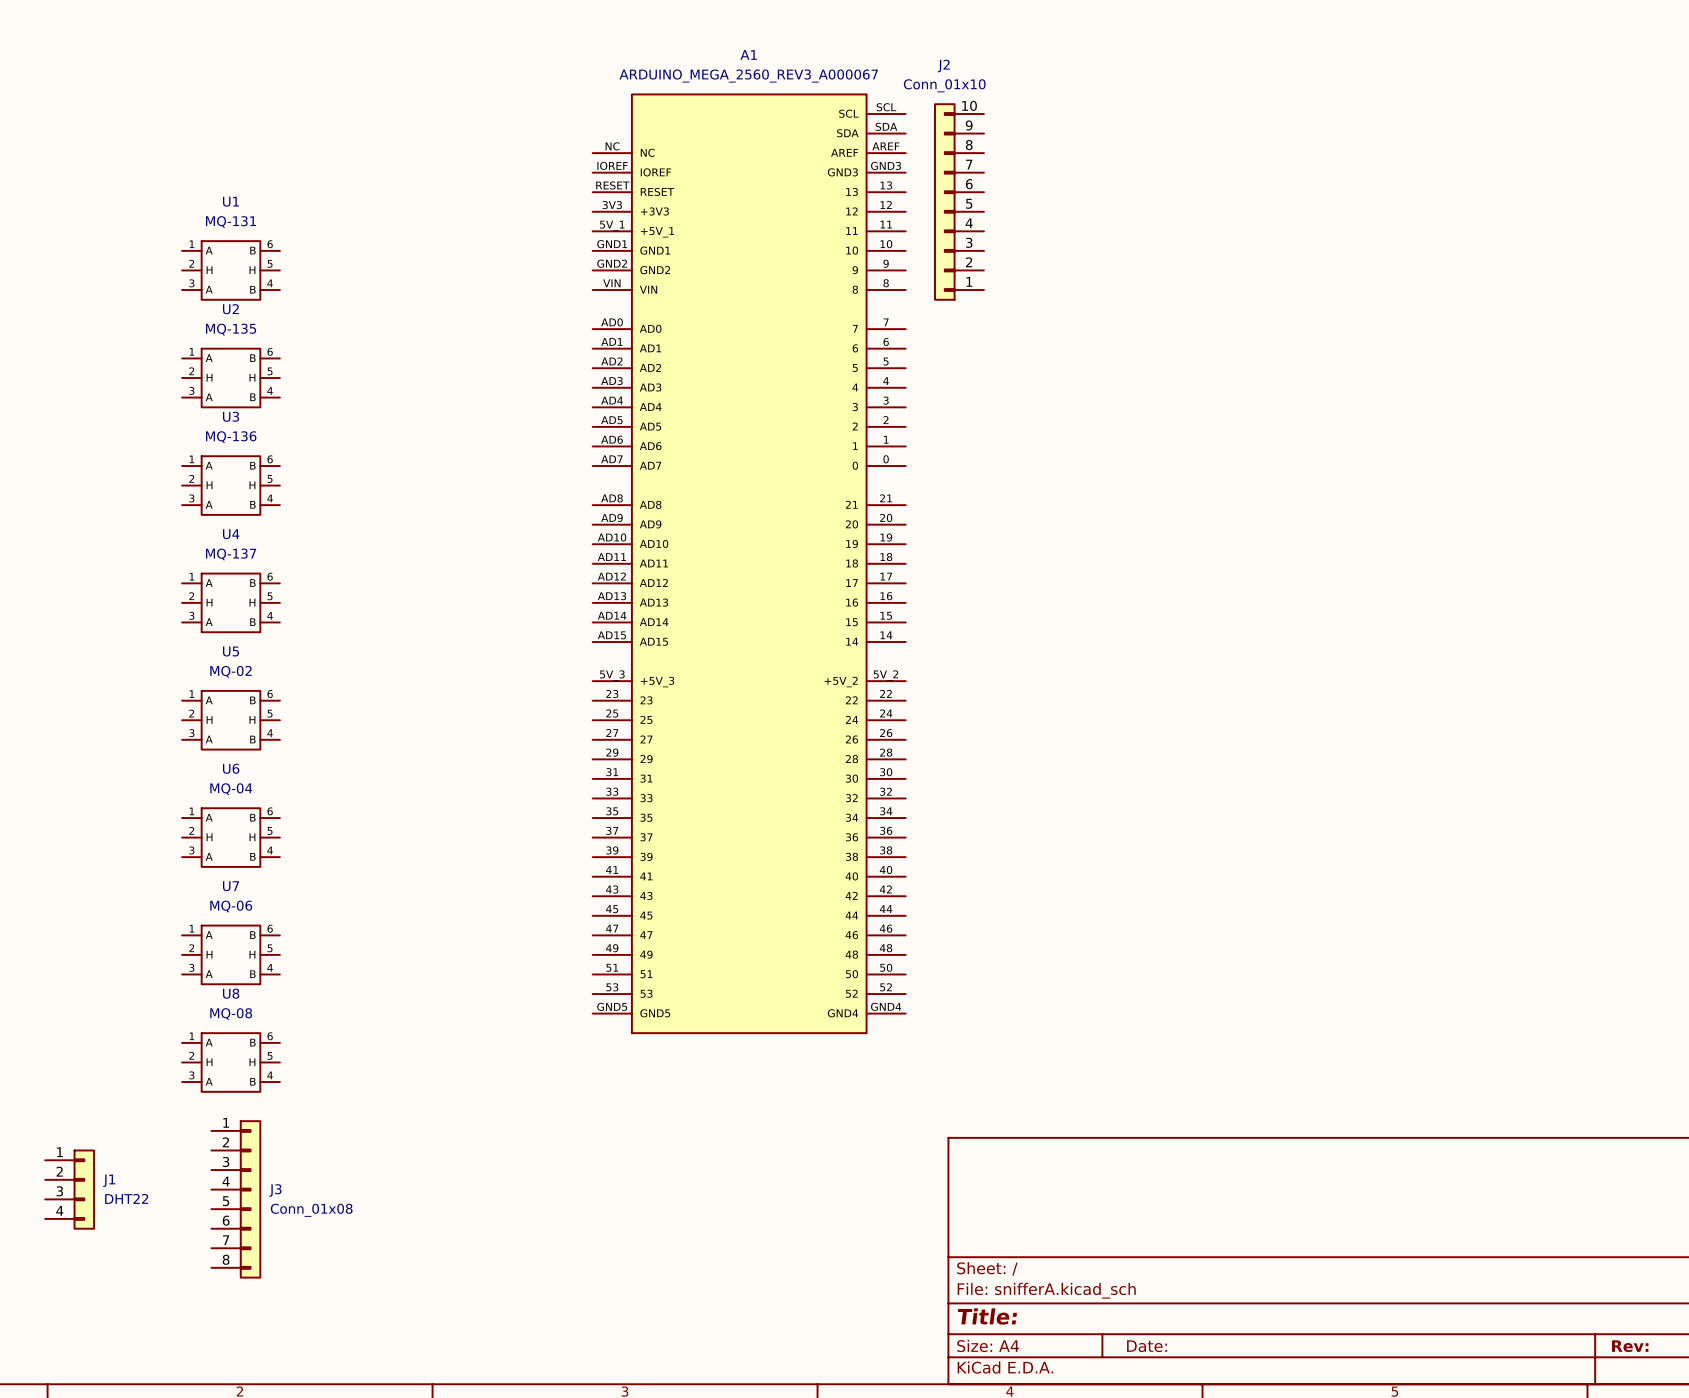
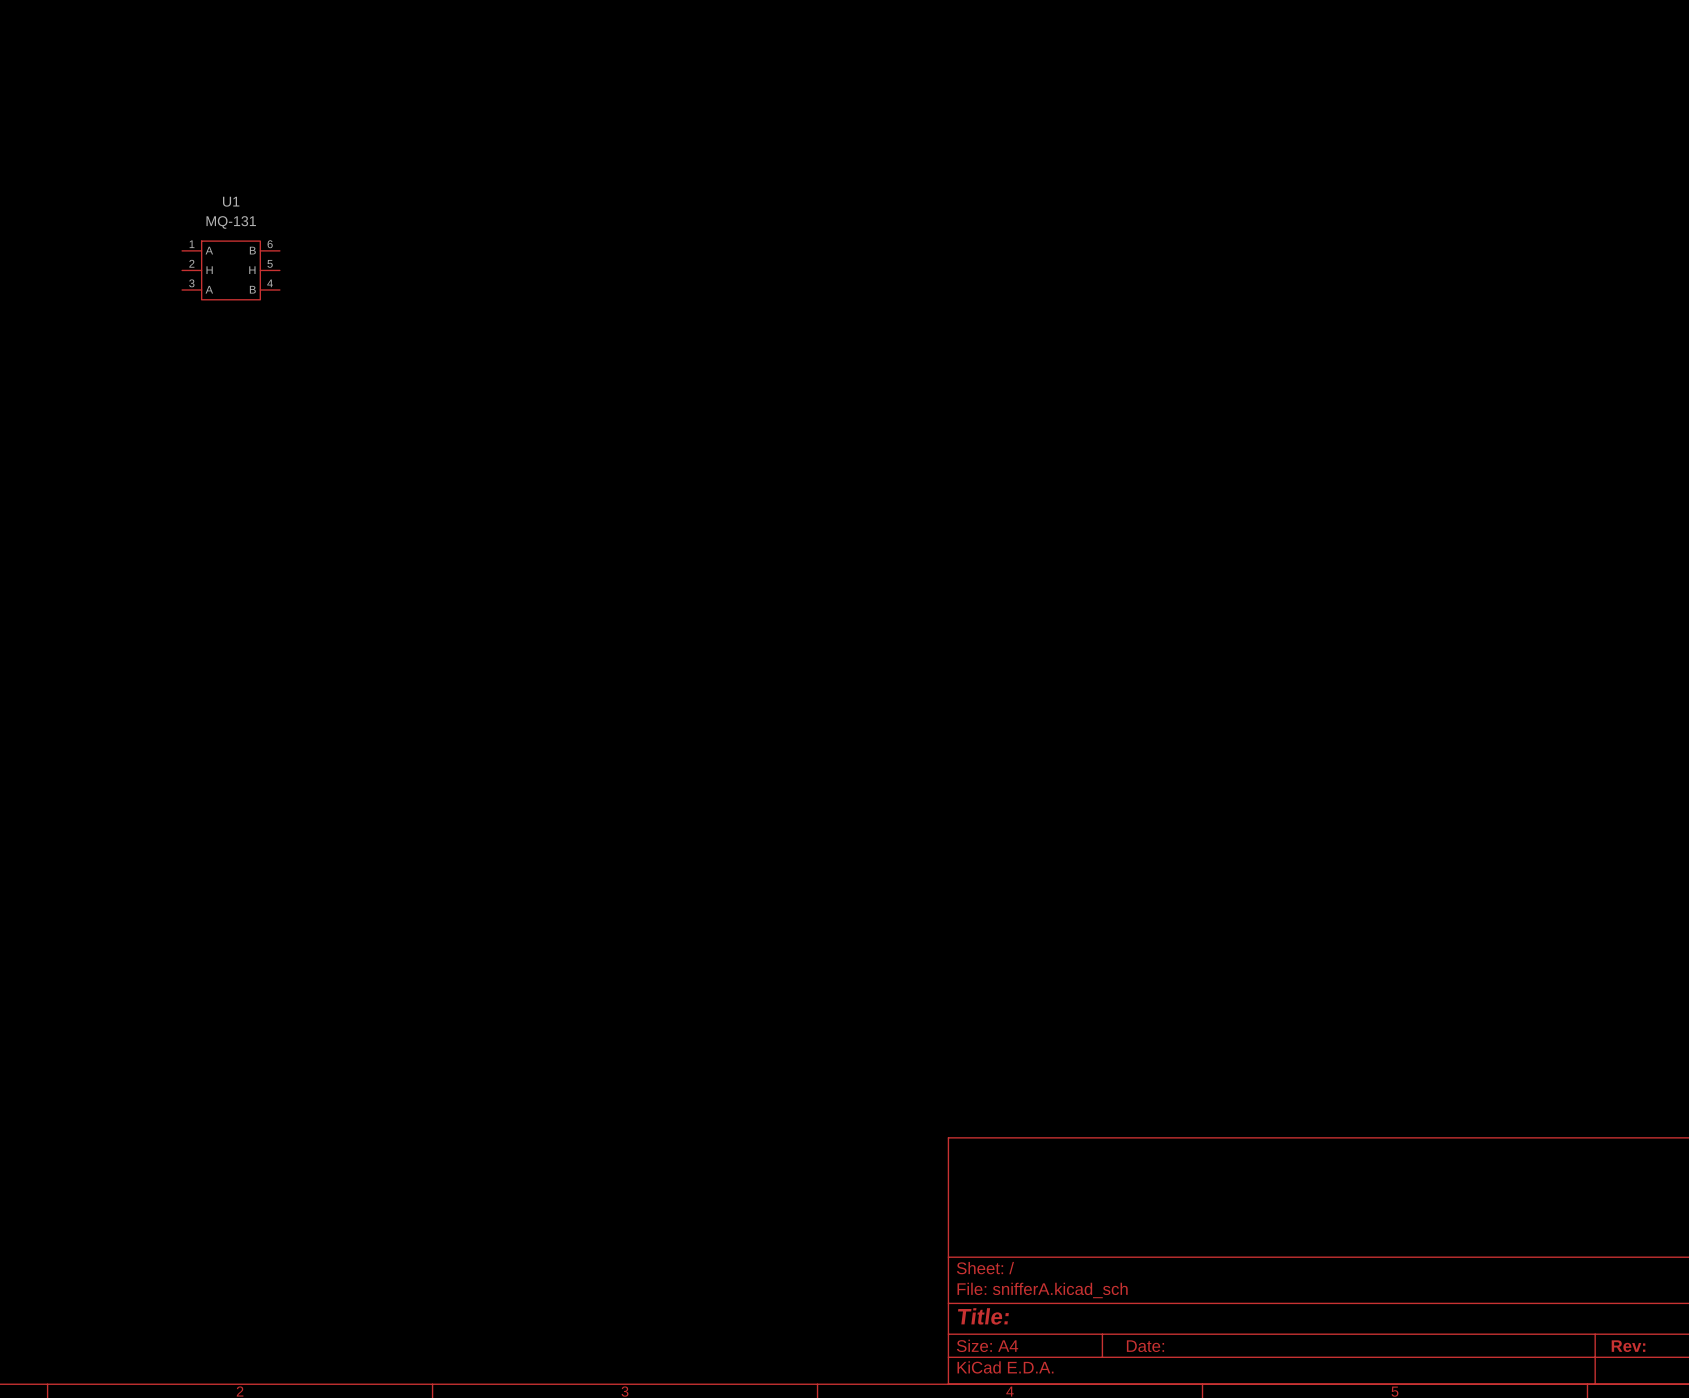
J2: Conn_01x10 (958, 201) -> none
U2: MQ-135 (230, 378) -> none
U3: MQ-136 (230, 485) -> none
A1: ARDUINO_MEGA_2560_REV3_A000067 (749, 563) -> none
U4: MQ-137 (230, 602) -> none
U5: MQ-02 (230, 720) -> none
U6: MQ-04 (230, 837) -> none
U7: MQ-06 (230, 954) -> none
U8: MQ-08 (230, 1062) -> none
J1: DHT22 (70, 1189) -> none
J3: Conn_01x08 (236, 1199) -> none

